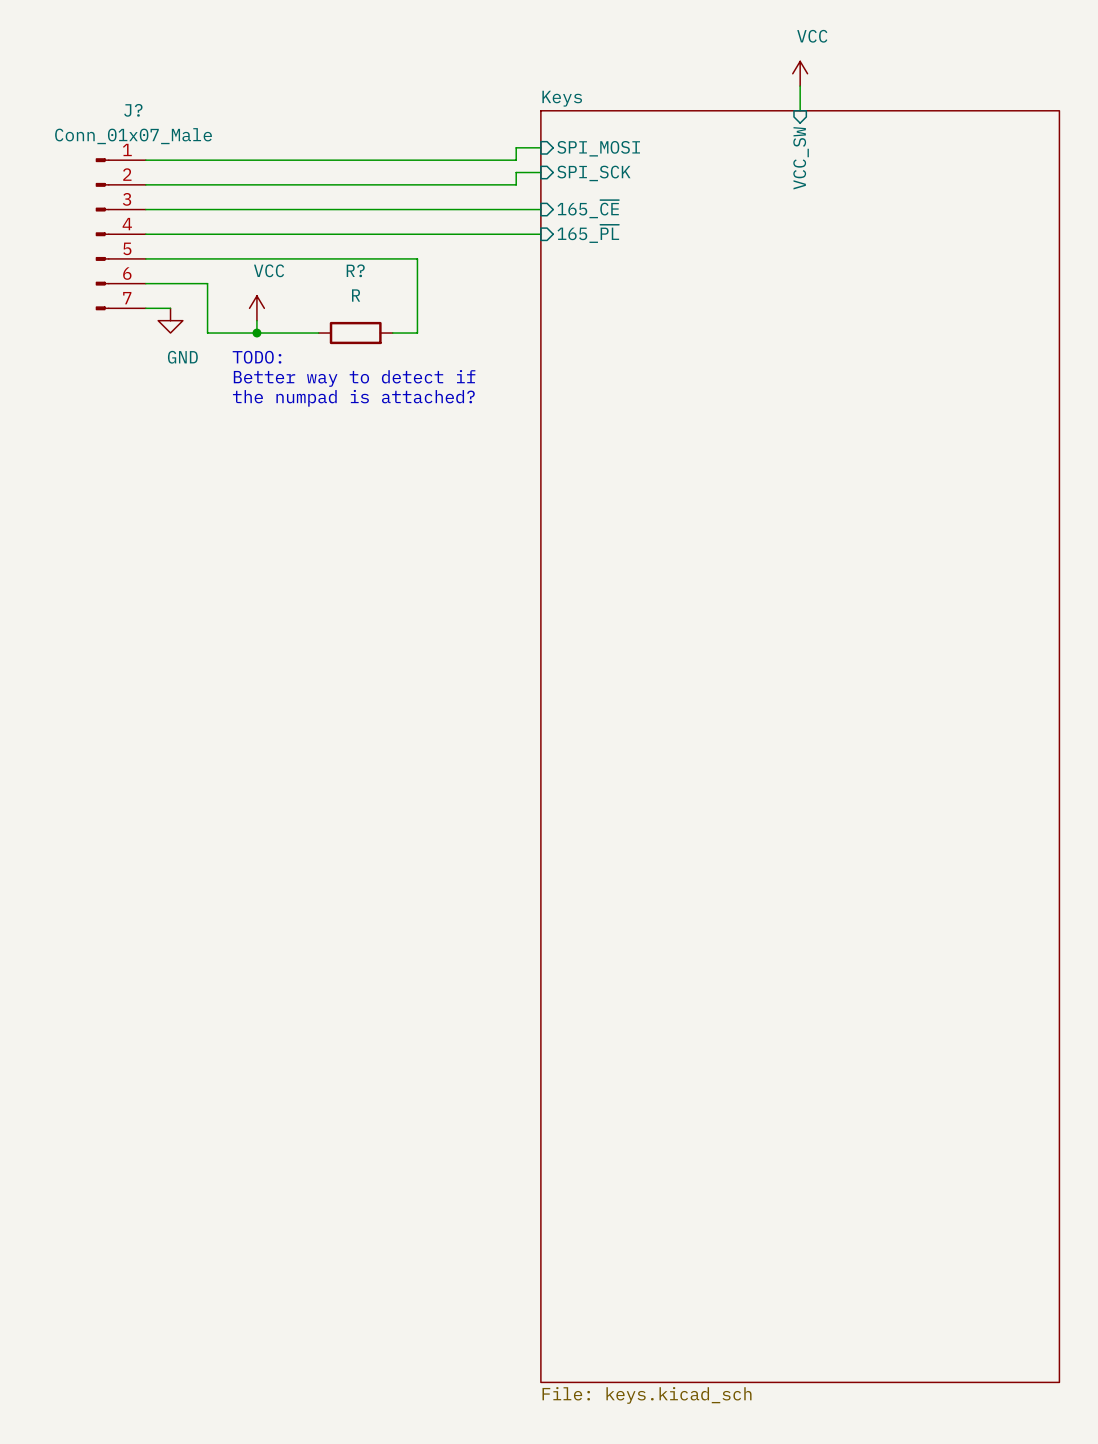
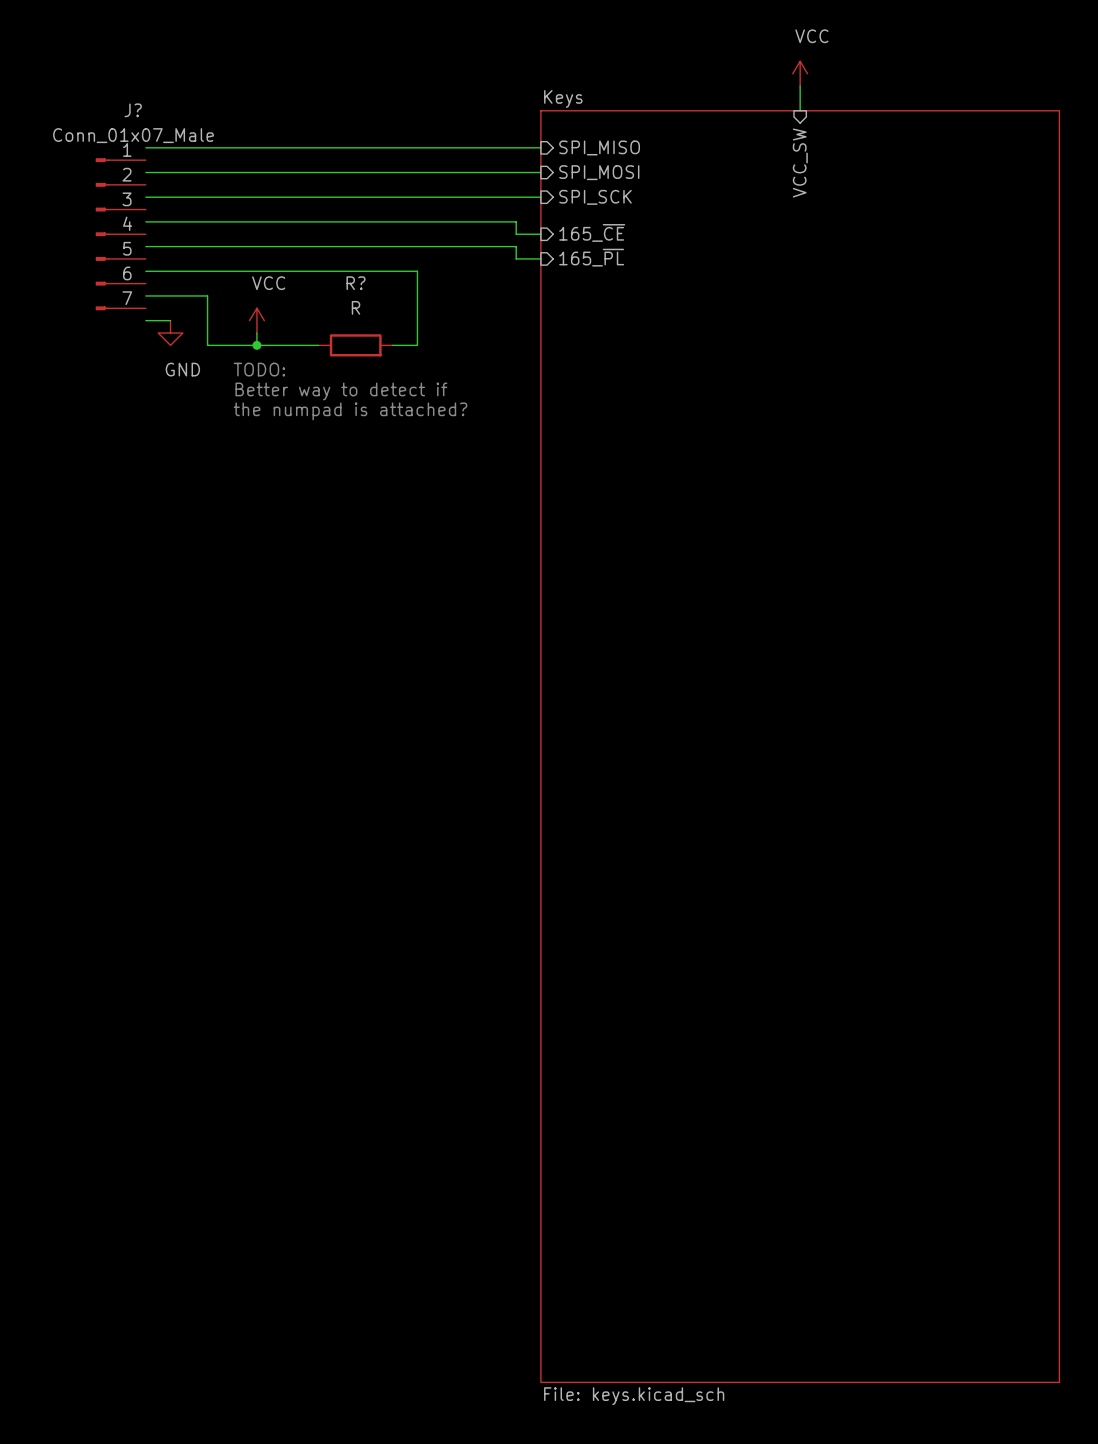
wire: (516, 147) (516, 160) (145, 160) -> (516, 147) (145, 147)
sheet pin: SPI_MOSI (598, 148) -> SPI_MISO (599, 147)
wire: (516, 172) (516, 184) (145, 184) -> (516, 172) (145, 172)
sheet pin: SPI_SCK (593, 173) -> SPI_MOSI (599, 172)
sheet pin: none -> SPI_SCK (595, 197)
wire: (145, 209) (540, 209) -> (145, 197) (540, 197)
sheet pin: 165_~{CE} (588, 209) -> none
sheet pin: 165_~{PL} (588, 233) -> 165_~{CE} (592, 232)
wire: (145, 234) (516, 234) -> (145, 221) (516, 221) (516, 234)
wire: none -> (145, 246) (516, 246) (516, 258) (540, 258)
wire: (145, 258) (417, 258) (417, 271) -> (145, 271) (417, 271)
sheet pin: none -> 165_~{PL} (591, 257)
wire: (145, 283) (207, 283) (207, 295) -> (145, 295) (207, 295)
wire: (145, 308) (170, 308) -> (145, 320) (170, 320)
power symbol position: VCC (256, 308) -> VCC (256, 320)
power symbol position: GND (170, 320) -> GND (170, 333)
wire: (207, 333) (318, 333) -> (207, 333) (207, 345) (318, 345)
junction position: (256, 333) -> (256, 345)
R? position: (355, 333) -> (355, 345)
wire: (392, 333) (417, 333) -> (392, 345) (417, 345) (417, 333)
text position: TODO: (257, 357) -> TODO: (259, 369)
text position: Better way to detect if (354, 378) -> Better way to detect if (341, 391)
text position: the numpad is attached? (353, 398) -> the numpad is attached? (350, 411)

